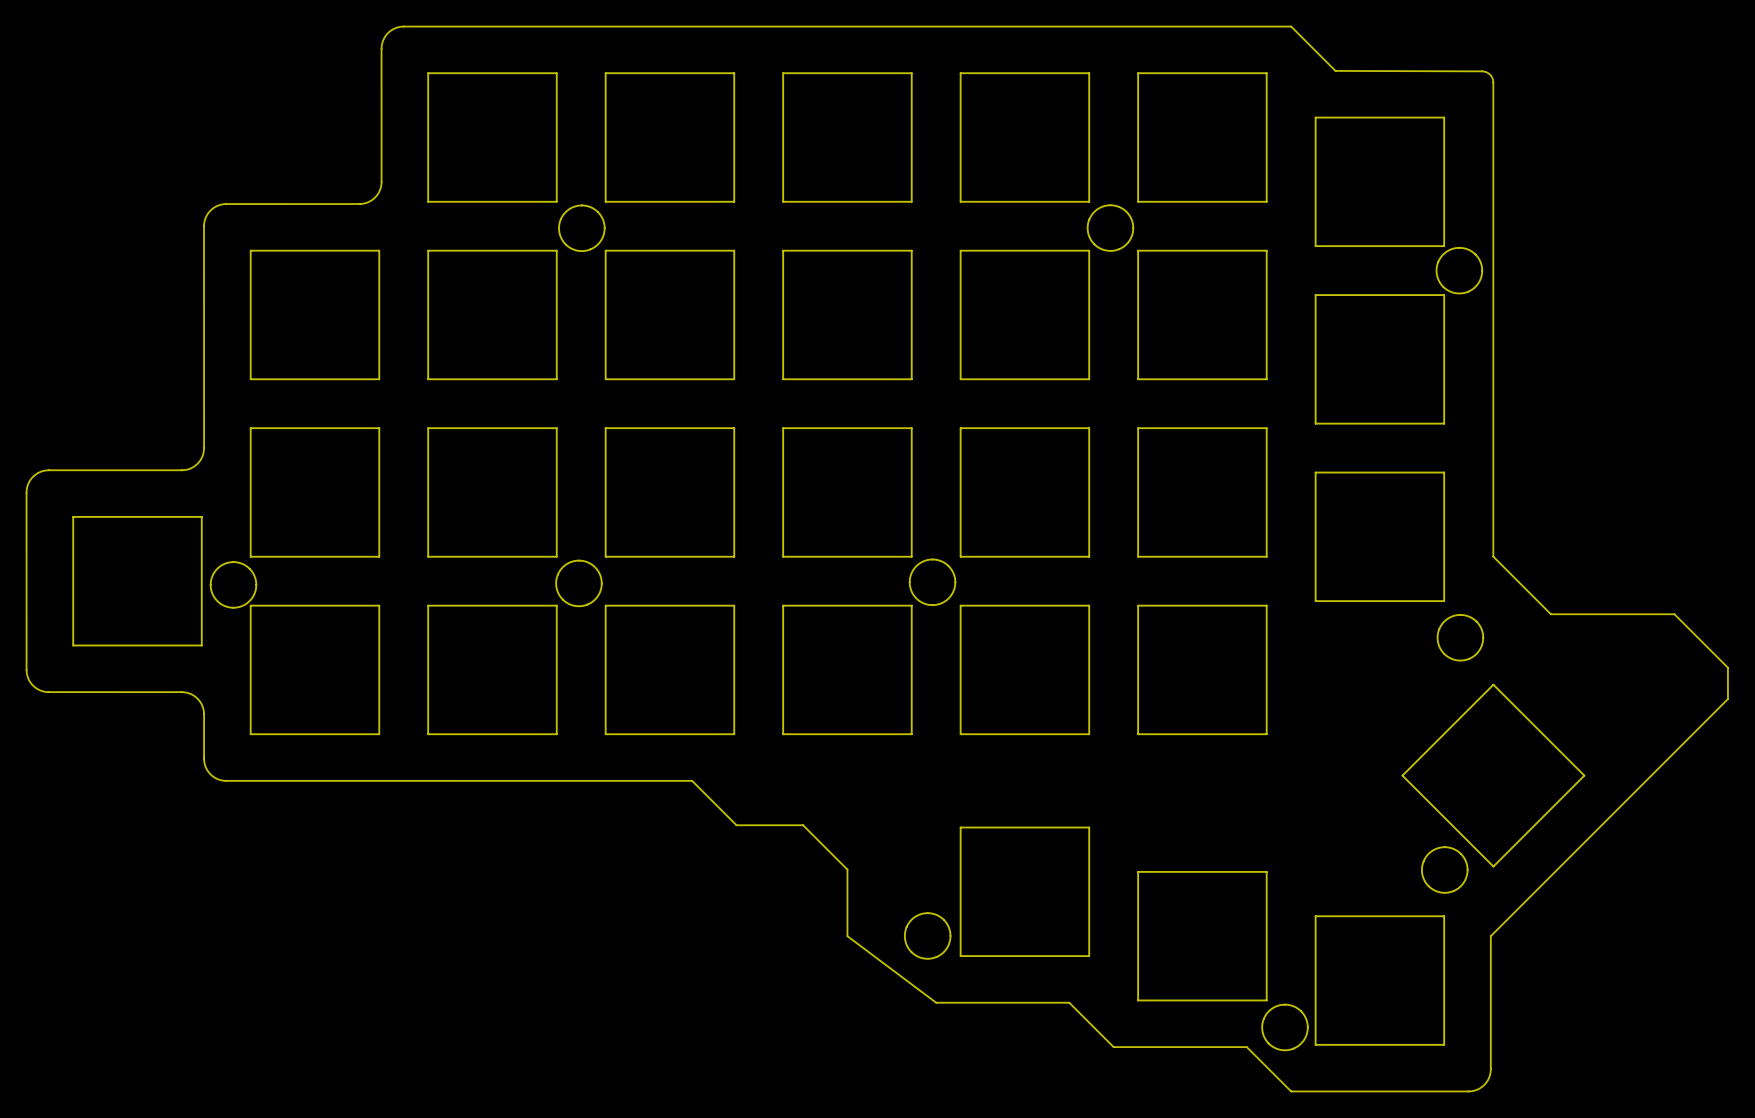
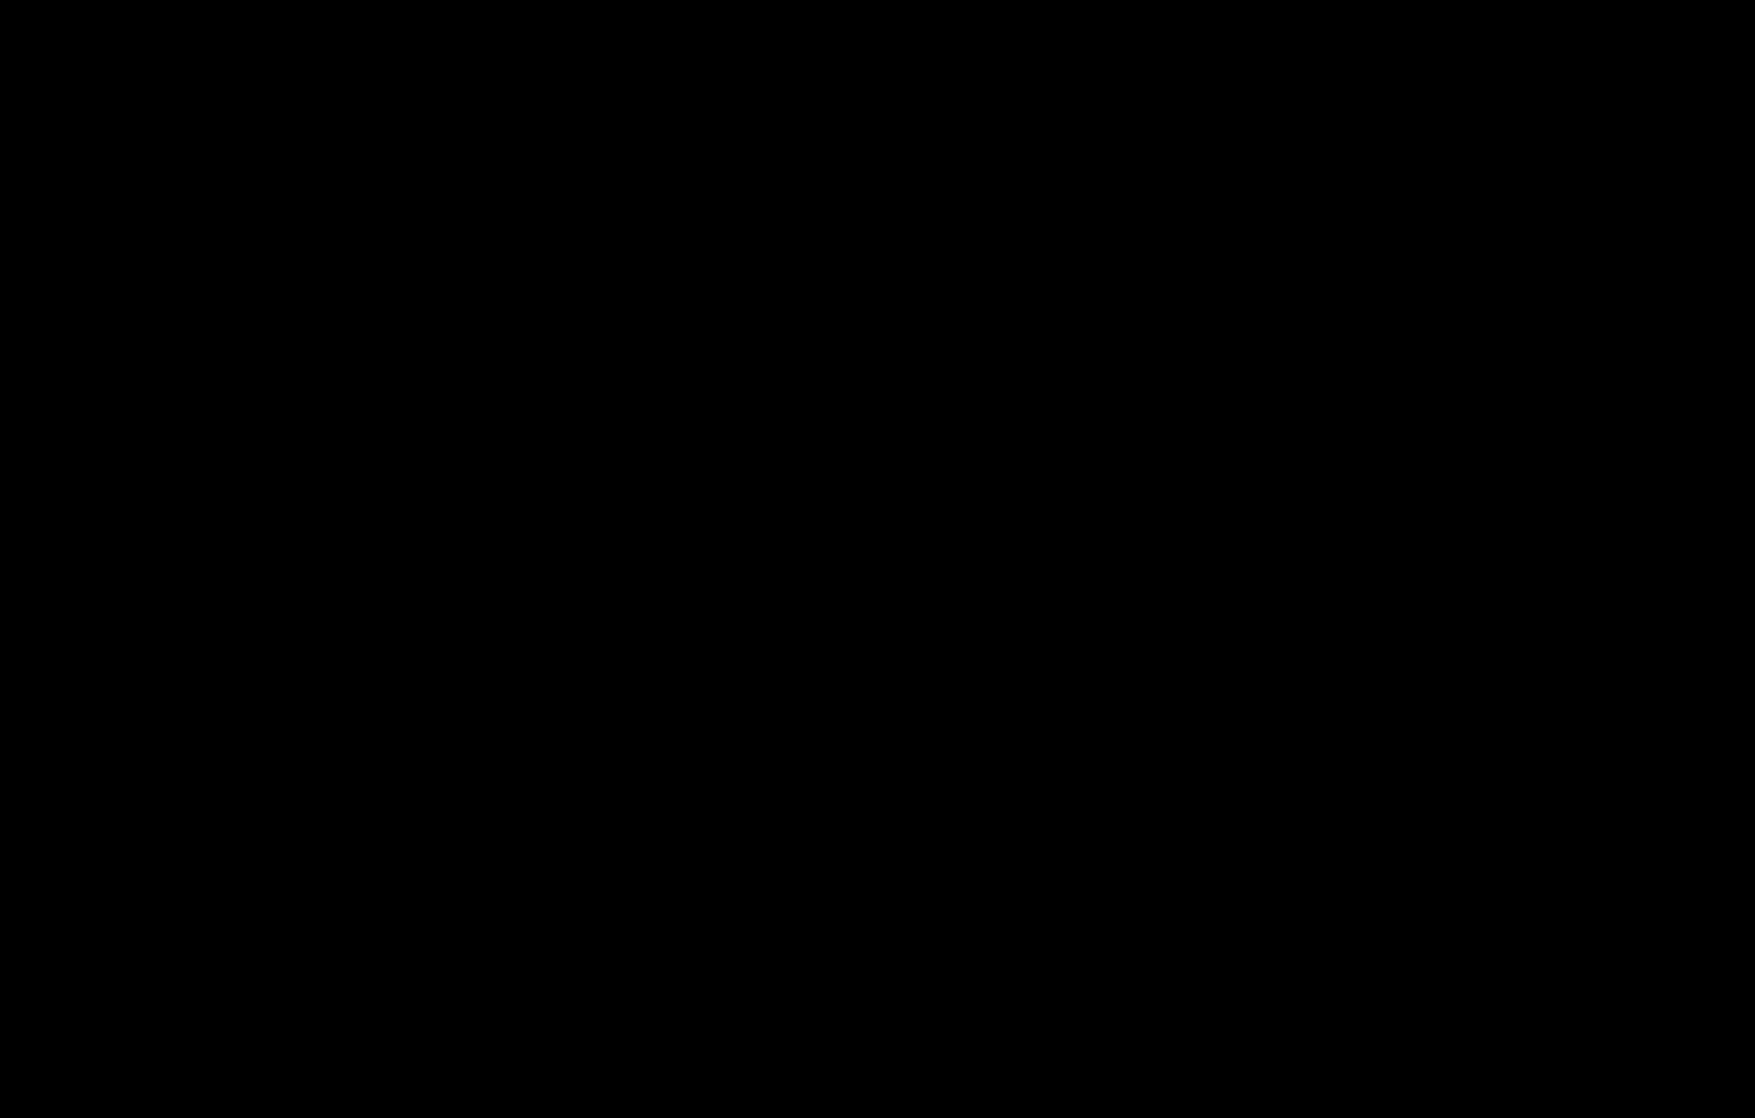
board edge: (381, 48) (381, 181) -> none
board edge: (381, 48) (382, 41) (388, 33) (394, 28) (403, 26) (1291, 26) (1335, 70) (1486, 72) (1491, 76) (1493, 82) (1493, 556) (1550, 614) (1674, 614) (1727, 667) (1727, 699) (1490, 936) (1490, 1072) (1484, 1084) (1477, 1089) (1468, 1091) (1291, 1091) (1246, 1047) (1113, 1047) (1069, 1002) (936, 1002) (847, 936) (847, 869) (803, 825) (736, 825) (692, 780) (226, 780) -> none
board edge: (428, 73) (556, 73) (556, 201) (428, 201) (428, 73) -> none
board edge: (605, 73) (734, 73) (734, 201) (605, 201) (605, 73) -> none
board edge: (783, 73) (911, 73) (911, 201) (783, 201) (783, 73) -> none
board edge: (960, 73) (960, 201) (1089, 201) (1089, 73) (960, 73) -> none
board edge: (1138, 73) (1138, 201) (1266, 201) (1266, 73) (1138, 73) -> none
board edge: (1315, 117) (1315, 246) (1444, 246) (1444, 117) (1315, 117) -> none
board edge: (381, 181) (376, 195) (364, 203) (223, 204) (215, 207) (207, 215) (204, 226) (204, 448) (201, 457) (195, 465) (181, 470) (46, 470) (34, 475) (27, 487) (26, 669) (31, 683) (37, 689) (45, 691) (181, 692) (191, 694) (199, 700) (203, 709) (205, 767) (215, 777) (226, 780) -> none
board edge: (581, 205) (590, 207) (597, 212) (602, 219) (604, 228) (603, 236) (597, 244) (590, 249) (582, 251) (572, 249) (565, 244) (560, 237) (559, 227) (560, 219) (565, 212) (573, 207) (581, 205) -> none
board edge: (1110, 205) (1119, 207) (1126, 211) (1131, 219) (1133, 228) (1131, 236) (1126, 244) (1119, 249) (1110, 250) (1101, 248) (1094, 244) (1089, 237) (1087, 227) (1089, 219) (1093, 212) (1102, 206) (1110, 205) -> none
board edge: (1459, 247) (1468, 249) (1475, 254) (1480, 261) (1482, 270) (1480, 278) (1475, 287) (1468, 291) (1459, 293) (1450, 291) (1443, 286) (1438, 279) (1436, 270) (1438, 261) (1442, 254) (1451, 249) (1459, 247) -> none
board edge: (250, 250) (379, 250) (379, 379) (250, 379) (250, 250) -> none
board edge: (428, 250) (556, 250) (556, 379) (428, 379) (428, 250) -> none
board edge: (605, 250) (734, 250) (734, 379) (605, 379) (605, 250) -> none
board edge: (783, 250) (911, 250) (911, 379) (783, 379) (783, 250) -> none
board edge: (960, 250) (1089, 250) (1089, 379) (960, 379) (960, 250) -> none
board edge: (1138, 250) (1138, 379) (1266, 379) (1266, 250) (1138, 250) -> none
board edge: (1315, 295) (1315, 423) (1444, 423) (1444, 295) (1315, 295) -> none
board edge: (250, 428) (379, 428) (379, 556) (250, 556) (250, 428) -> none
board edge: (428, 428) (556, 428) (556, 556) (428, 556) (428, 428) -> none
board edge: (605, 428) (734, 428) (734, 556) (605, 556) (605, 428) -> none
board edge: (783, 428) (911, 428) (911, 556) (783, 556) (783, 428) -> none
board edge: (960, 428) (1089, 428) (1089, 556) (960, 556) (960, 428) -> none
board edge: (1138, 428) (1138, 556) (1266, 556) (1266, 428) (1138, 428) -> none
board edge: (1315, 472) (1315, 601) (1444, 601) (1444, 472) (1315, 472) -> none
board edge: (73, 516) (73, 645) (201, 645) (201, 516) (73, 516) -> none
board edge: (932, 559) (941, 561) (948, 566) (953, 573) (955, 582) (953, 591) (948, 598) (941, 603) (932, 605) (923, 603) (916, 598) (911, 591) (909, 582) (911, 573) (916, 566) (923, 561) (932, 559) -> none
board edge: (578, 560) (587, 562) (595, 567) (599, 574) (601, 583) (600, 591) (594, 599) (587, 604) (579, 606) (569, 604) (562, 599) (558, 592) (556, 582) (557, 574) (562, 567) (570, 562) (578, 560) -> none
board edge: (233, 562) (242, 563) (249, 568) (254, 576) (256, 584) (254, 593) (249, 601) (242, 605) (233, 607) (224, 605) (217, 601) (212, 593) (210, 584) (212, 576) (217, 568) (224, 563) (233, 562) -> none
board edge: (250, 605) (379, 605) (379, 734) (250, 734) (250, 605) -> none
board edge: (428, 605) (556, 605) (556, 734) (428, 734) (428, 605) -> none
board edge: (605, 605) (734, 605) (734, 734) (605, 734) (605, 605) -> none
board edge: (783, 605) (911, 605) (911, 734) (783, 734) (783, 605) -> none
board edge: (960, 605) (1089, 605) (1089, 734) (960, 734) (960, 605) -> none
board edge: (1138, 605) (1266, 605) (1266, 734) (1138, 734) (1138, 605) -> none
board edge: (1460, 614) (1469, 616) (1476, 621) (1481, 629) (1483, 637) (1481, 646) (1476, 654) (1469, 658) (1460, 660) (1451, 658) (1444, 653) (1439, 646) (1437, 637) (1439, 629) (1443, 621) (1452, 616) (1460, 614) -> none
board edge: (1493, 684) (1402, 775) (1493, 866) (1584, 775) (1493, 684) -> none
board edge: (960, 827) (960, 956) (1089, 956) (1089, 827) (960, 827) -> none
board edge: (1444, 847) (1453, 848) (1460, 853) (1465, 861) (1467, 870) (1466, 878) (1460, 886) (1453, 891) (1445, 892) (1435, 890) (1428, 886) (1423, 879) (1421, 869) (1423, 861) (1428, 854) (1436, 848) (1444, 847) -> none
board edge: (1138, 871) (1138, 1000) (1266, 1000) (1266, 871) (1138, 871) -> none
board edge: (927, 913) (936, 914) (943, 919) (948, 927) (950, 935) (948, 944) (943, 952) (936, 957) (928, 958) (918, 956) (911, 952) (906, 945) (904, 935) (906, 927) (911, 920) (919, 914) (927, 913) -> none
board edge: (1315, 916) (1444, 916) (1444, 1044) (1315, 1044) (1315, 916) -> none
board edge: (1284, 1004) (1293, 1006) (1301, 1011) (1306, 1018) (1307, 1027) (1306, 1035) (1300, 1043) (1293, 1048) (1285, 1050) (1275, 1048) (1268, 1043) (1264, 1036) (1262, 1026) (1263, 1018) (1268, 1011) (1276, 1006) (1284, 1004) -> none

